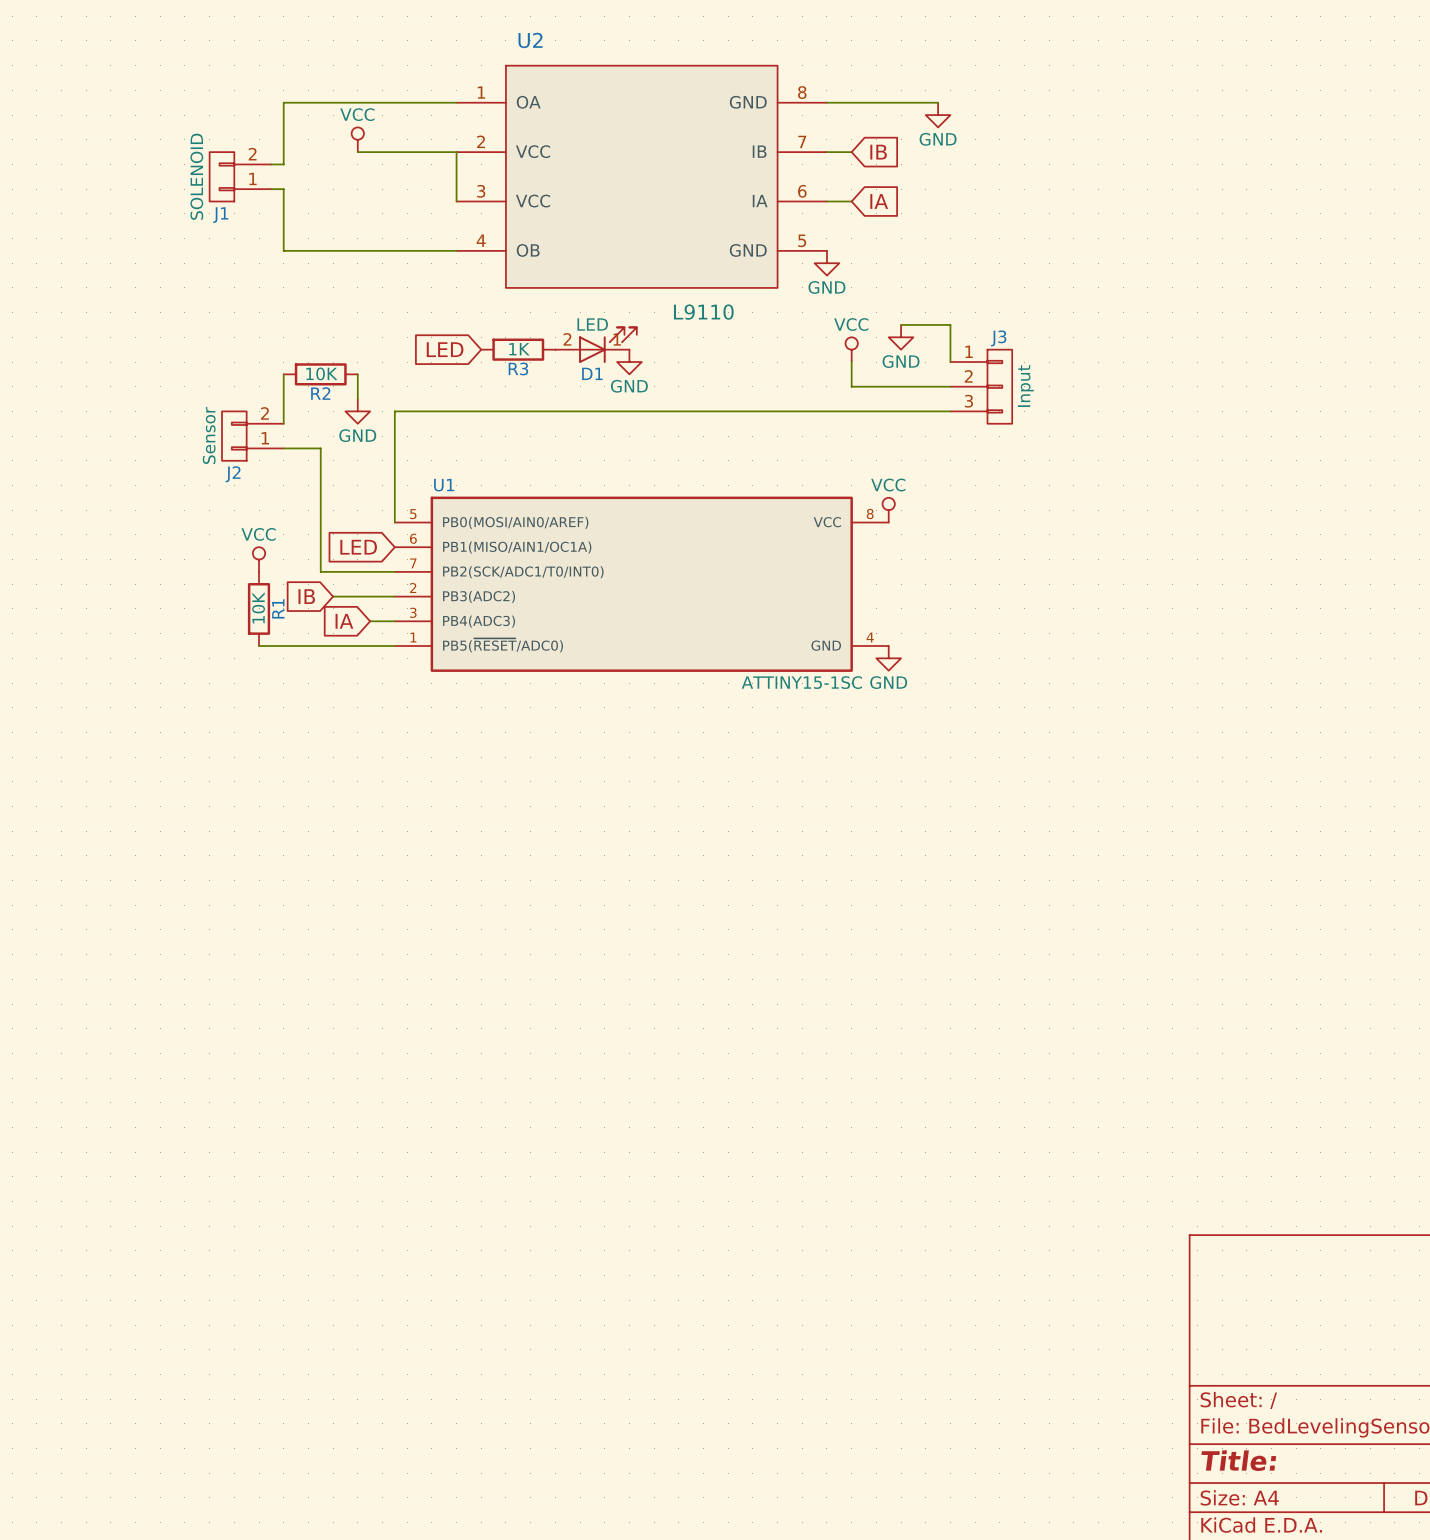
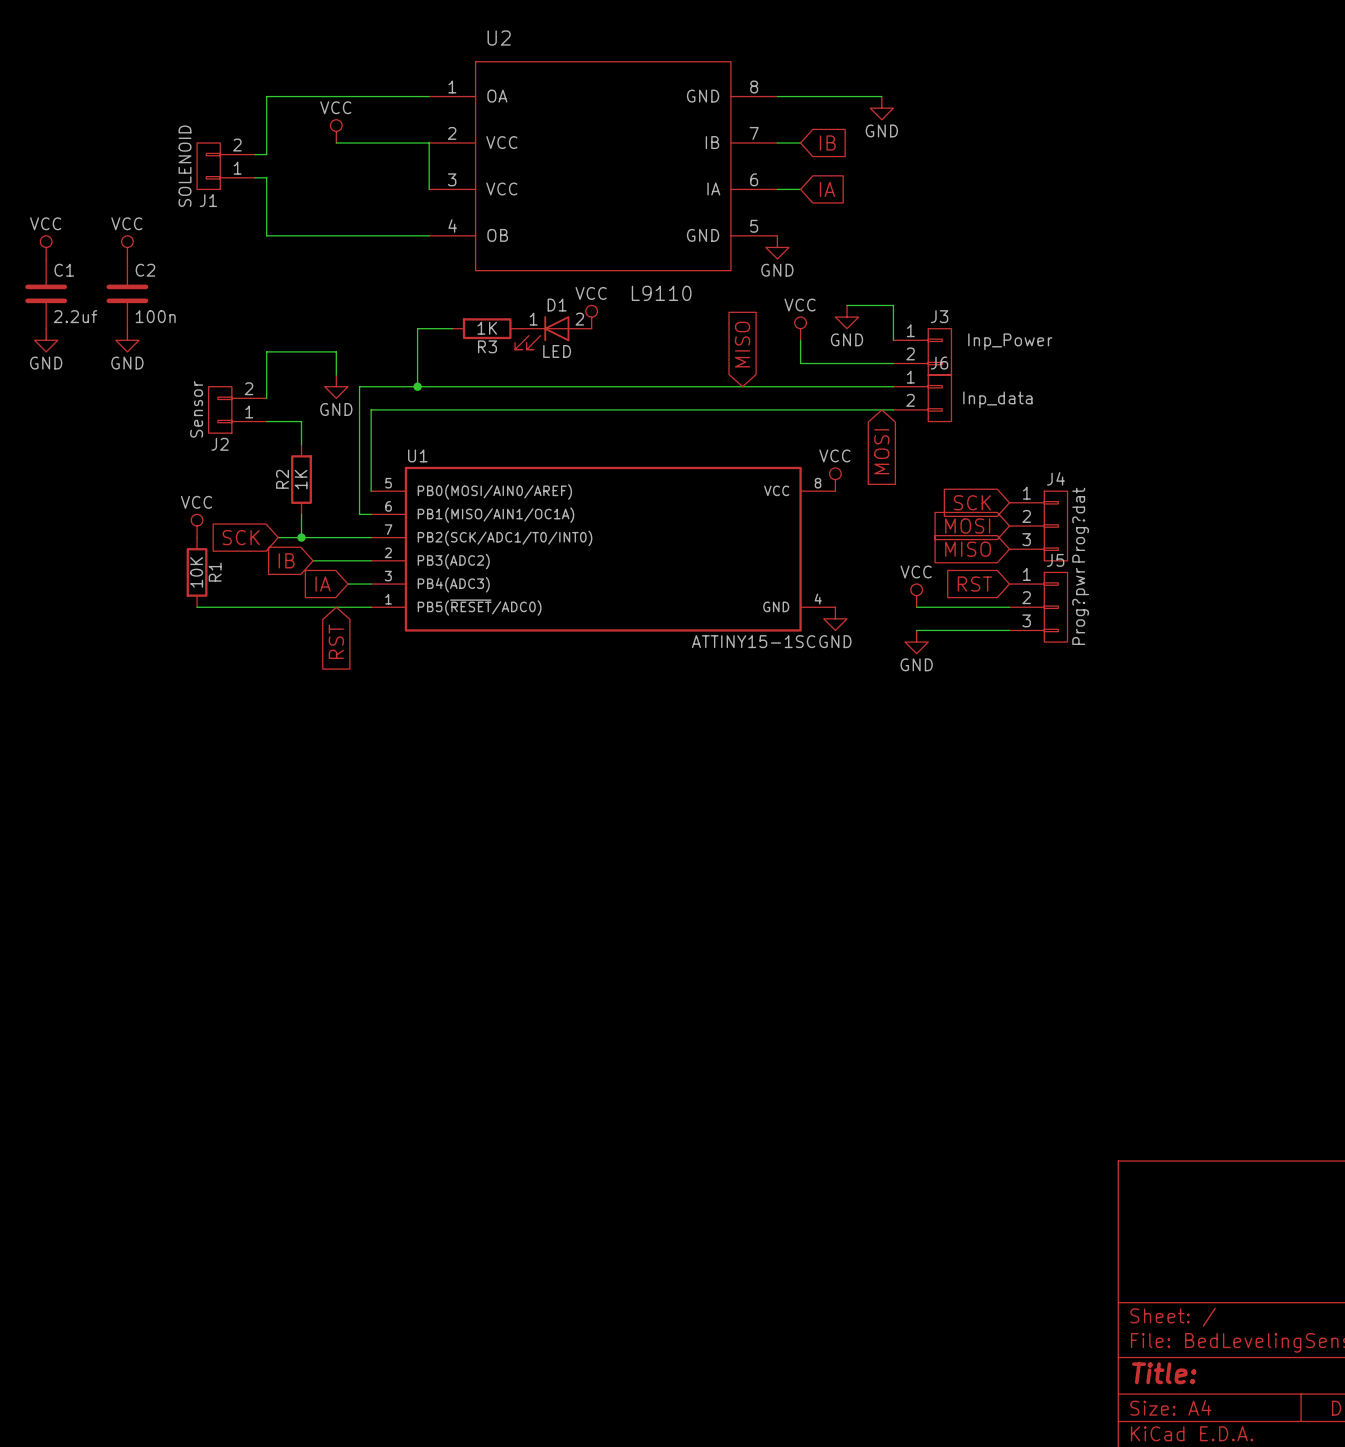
power symbol: none -> VCC (46, 247)
power symbol: none -> VCC (127, 247)
C1: none -> 2.2uf (46, 293)
C2: none -> 100n (127, 293)
power symbol: none -> VCC (591, 317)
D1 rotation: 0° (607, 345) -> 180° (542, 332)
global label: LED (445, 349) -> none
wire: none -> (452, 328) (417, 328) (417, 386)
J3 symbol: [950, 349, 1013, 424] -> [893, 328, 952, 376]
power symbol: none -> GND (46, 340)
power symbol: none -> GND (127, 340)
power symbol: GND (629, 362) -> none
global label: none -> MISO (742, 344)
R2 value: 10K (321, 373) -> 1K (301, 479)
wire: none -> (266, 351) (336, 351)
R2 rotation: 0° (320, 374) -> 90° clockwise (301, 479)
R2 position: (320, 374) -> (301, 479)
J3 value: Input (1025, 386) -> Inp_Power (1010, 341)
wire: (394, 411) (394, 436) -> (371, 386) (359, 386) (359, 514) (371, 514)
junction: none -> (417, 386)
J6: none -> Inp_data (922, 398)
wire: none -> (371, 409) (893, 409)
wire: (320, 473) (320, 547) -> none
global label: none -> MOSI (881, 451)
global label: none -> SCK (972, 502)
global label: LED (358, 547) -> none
power symbol position: VCC (259, 559) -> VCC (197, 526)
global label: none -> MOSI (967, 526)
J4: none -> Prog?dat (1038, 526)
global label: none -> SCK (241, 537)
wire: none -> (278, 537) (301, 537)
junction: none -> (301, 537)
global label: none -> MISO (968, 549)
R1 position: (259, 608) -> (197, 572)
global label: none -> RST (975, 584)
power symbol: none -> VCC (916, 595)
wire: none -> (197, 607) (243, 607)
wire: none -> (916, 607) (1009, 607)
J5: none -> Prog?pwr (1038, 607)
wire: none -> (916, 630) (1009, 630)
global label: none -> RST (336, 641)
power symbol: none -> GND (916, 642)

